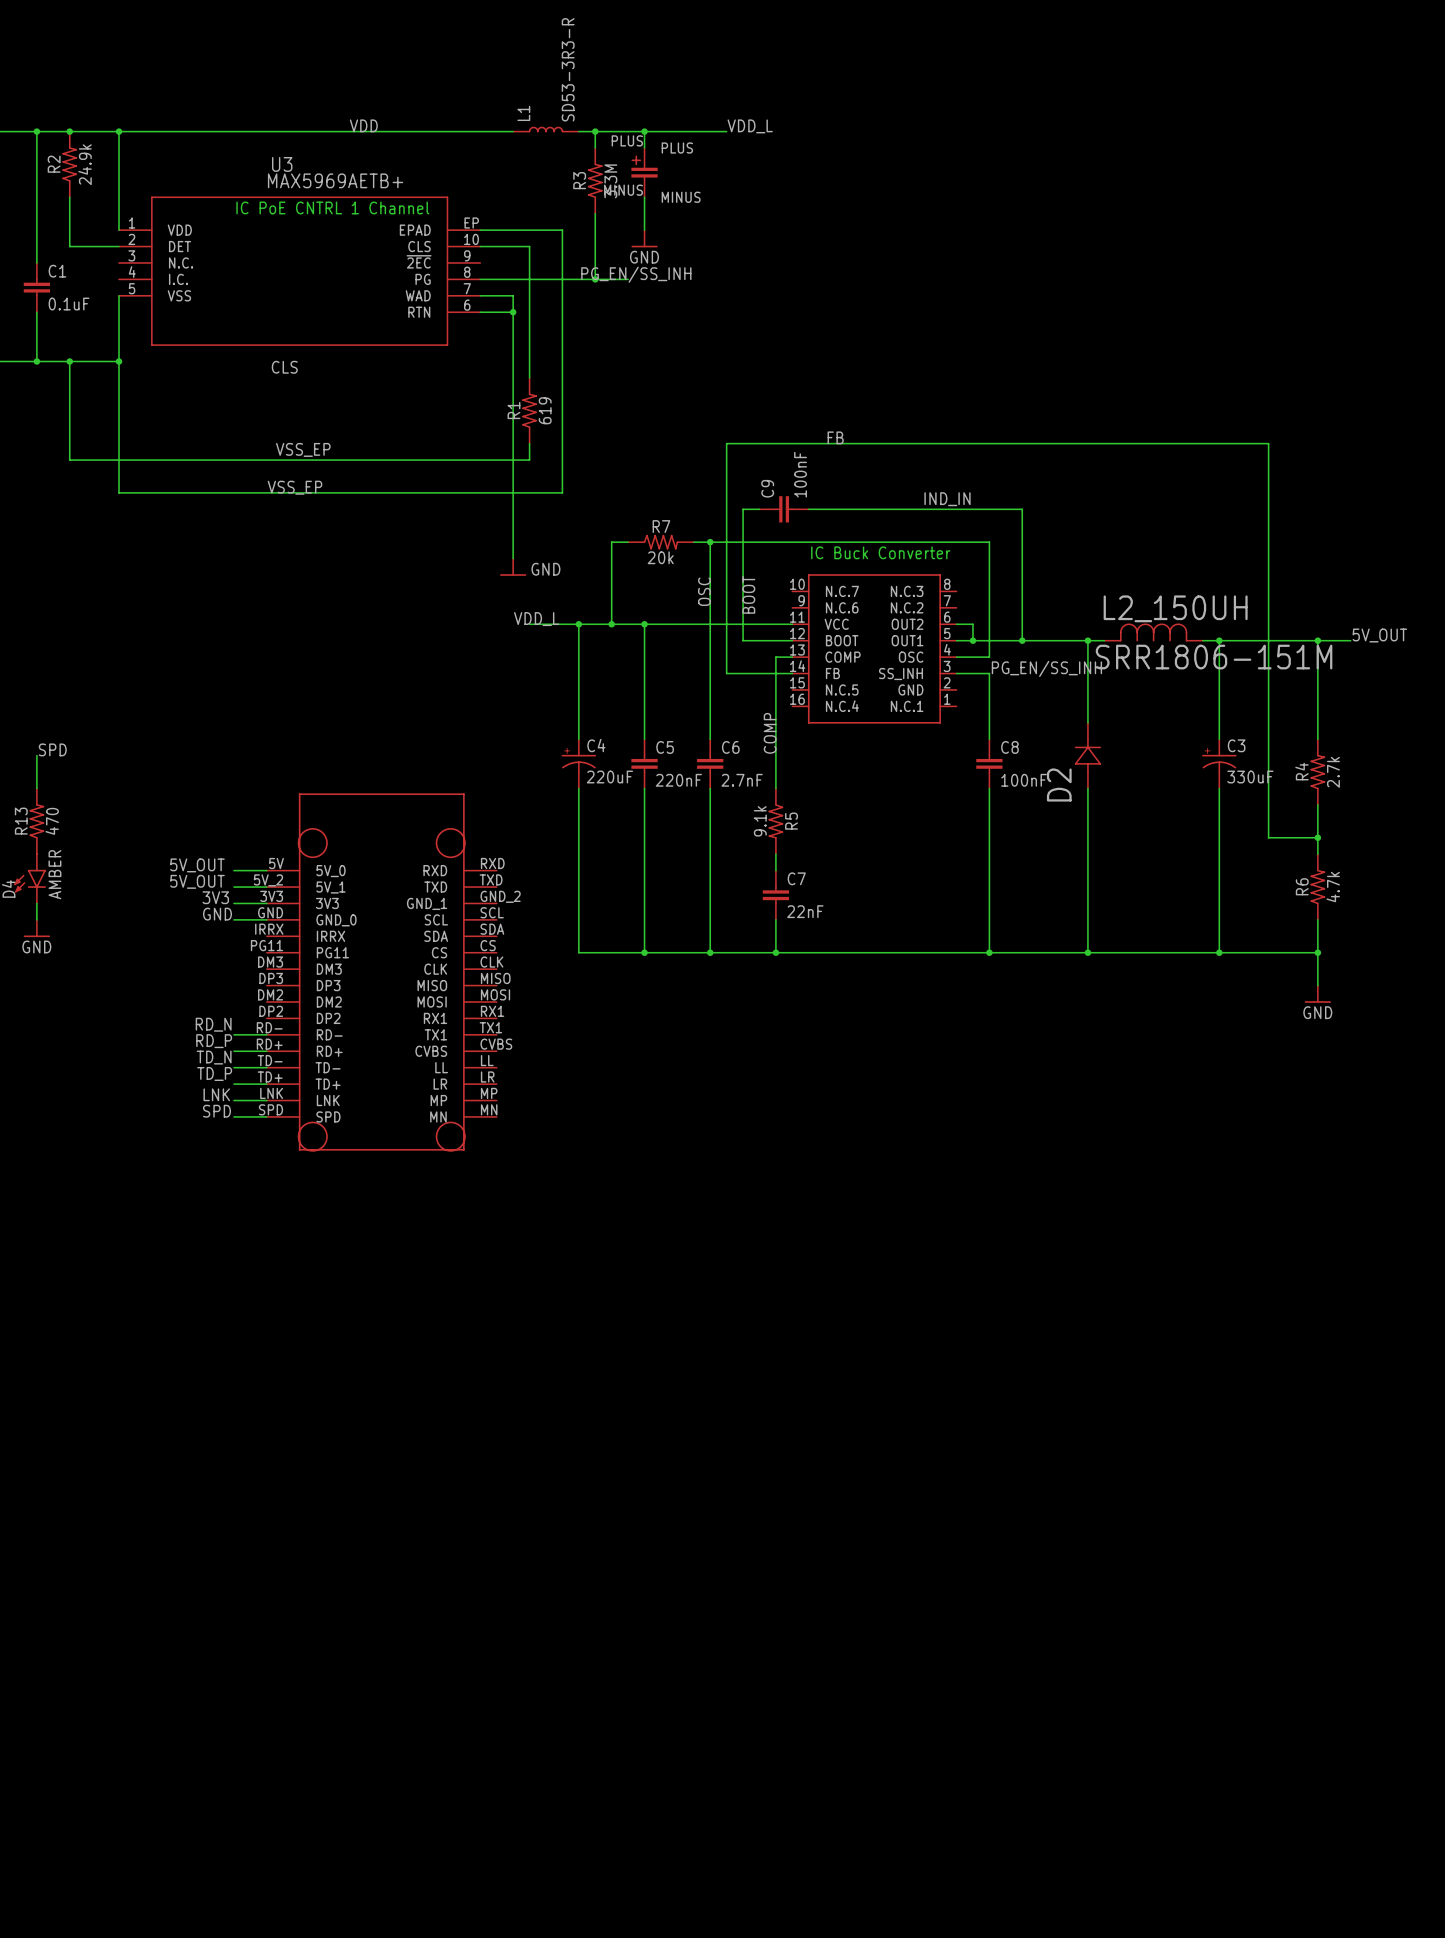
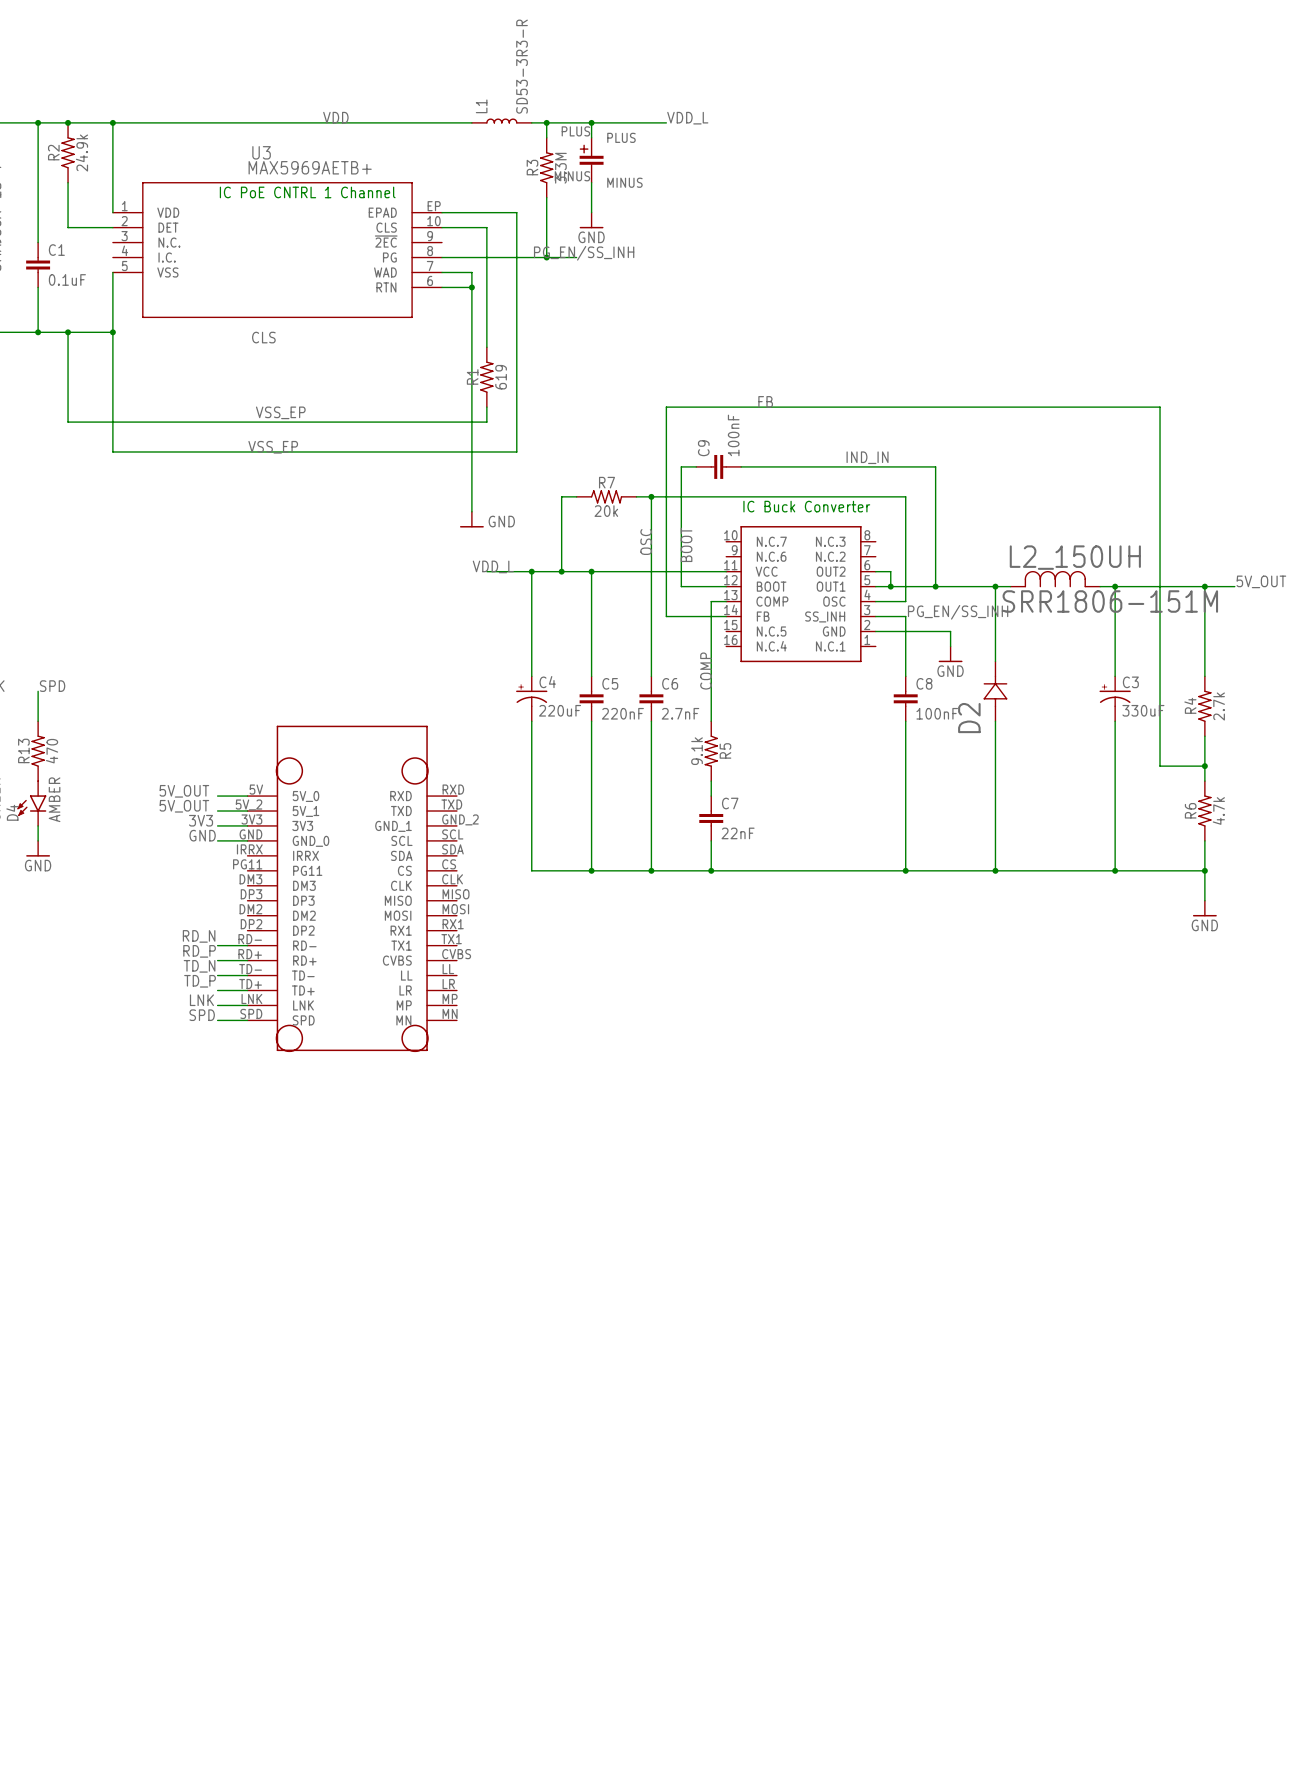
wire: none -> (875, 631) (950, 631) (950, 646)
power symbol: none -> GND (950, 654)

